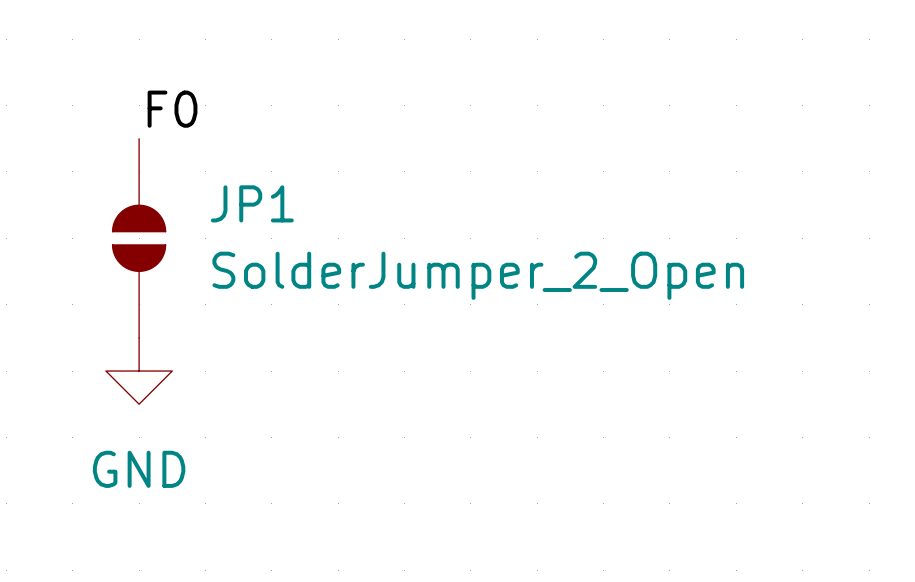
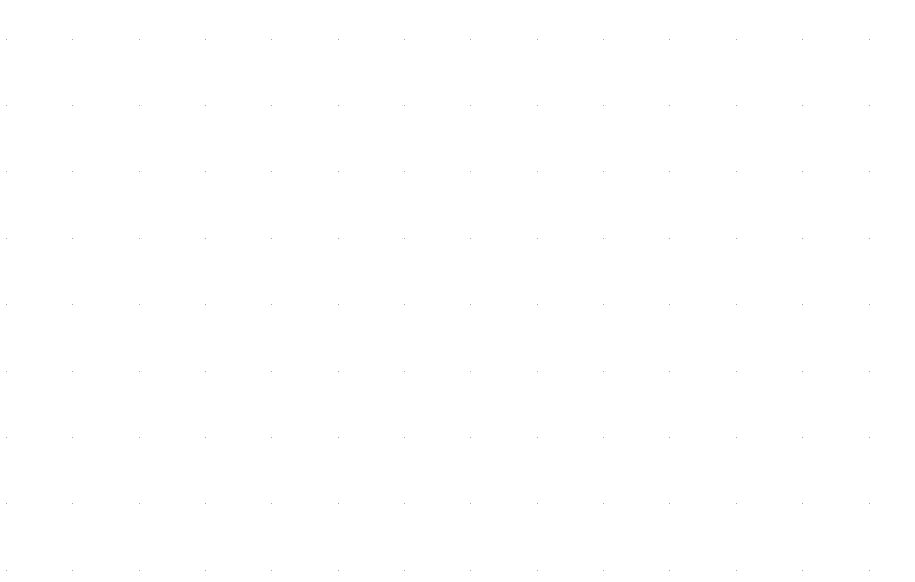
label: F0 (172, 109) -> none
JP1: SolderJumper_2_Open (139, 238) -> none
power symbol: GND (139, 371) -> none

